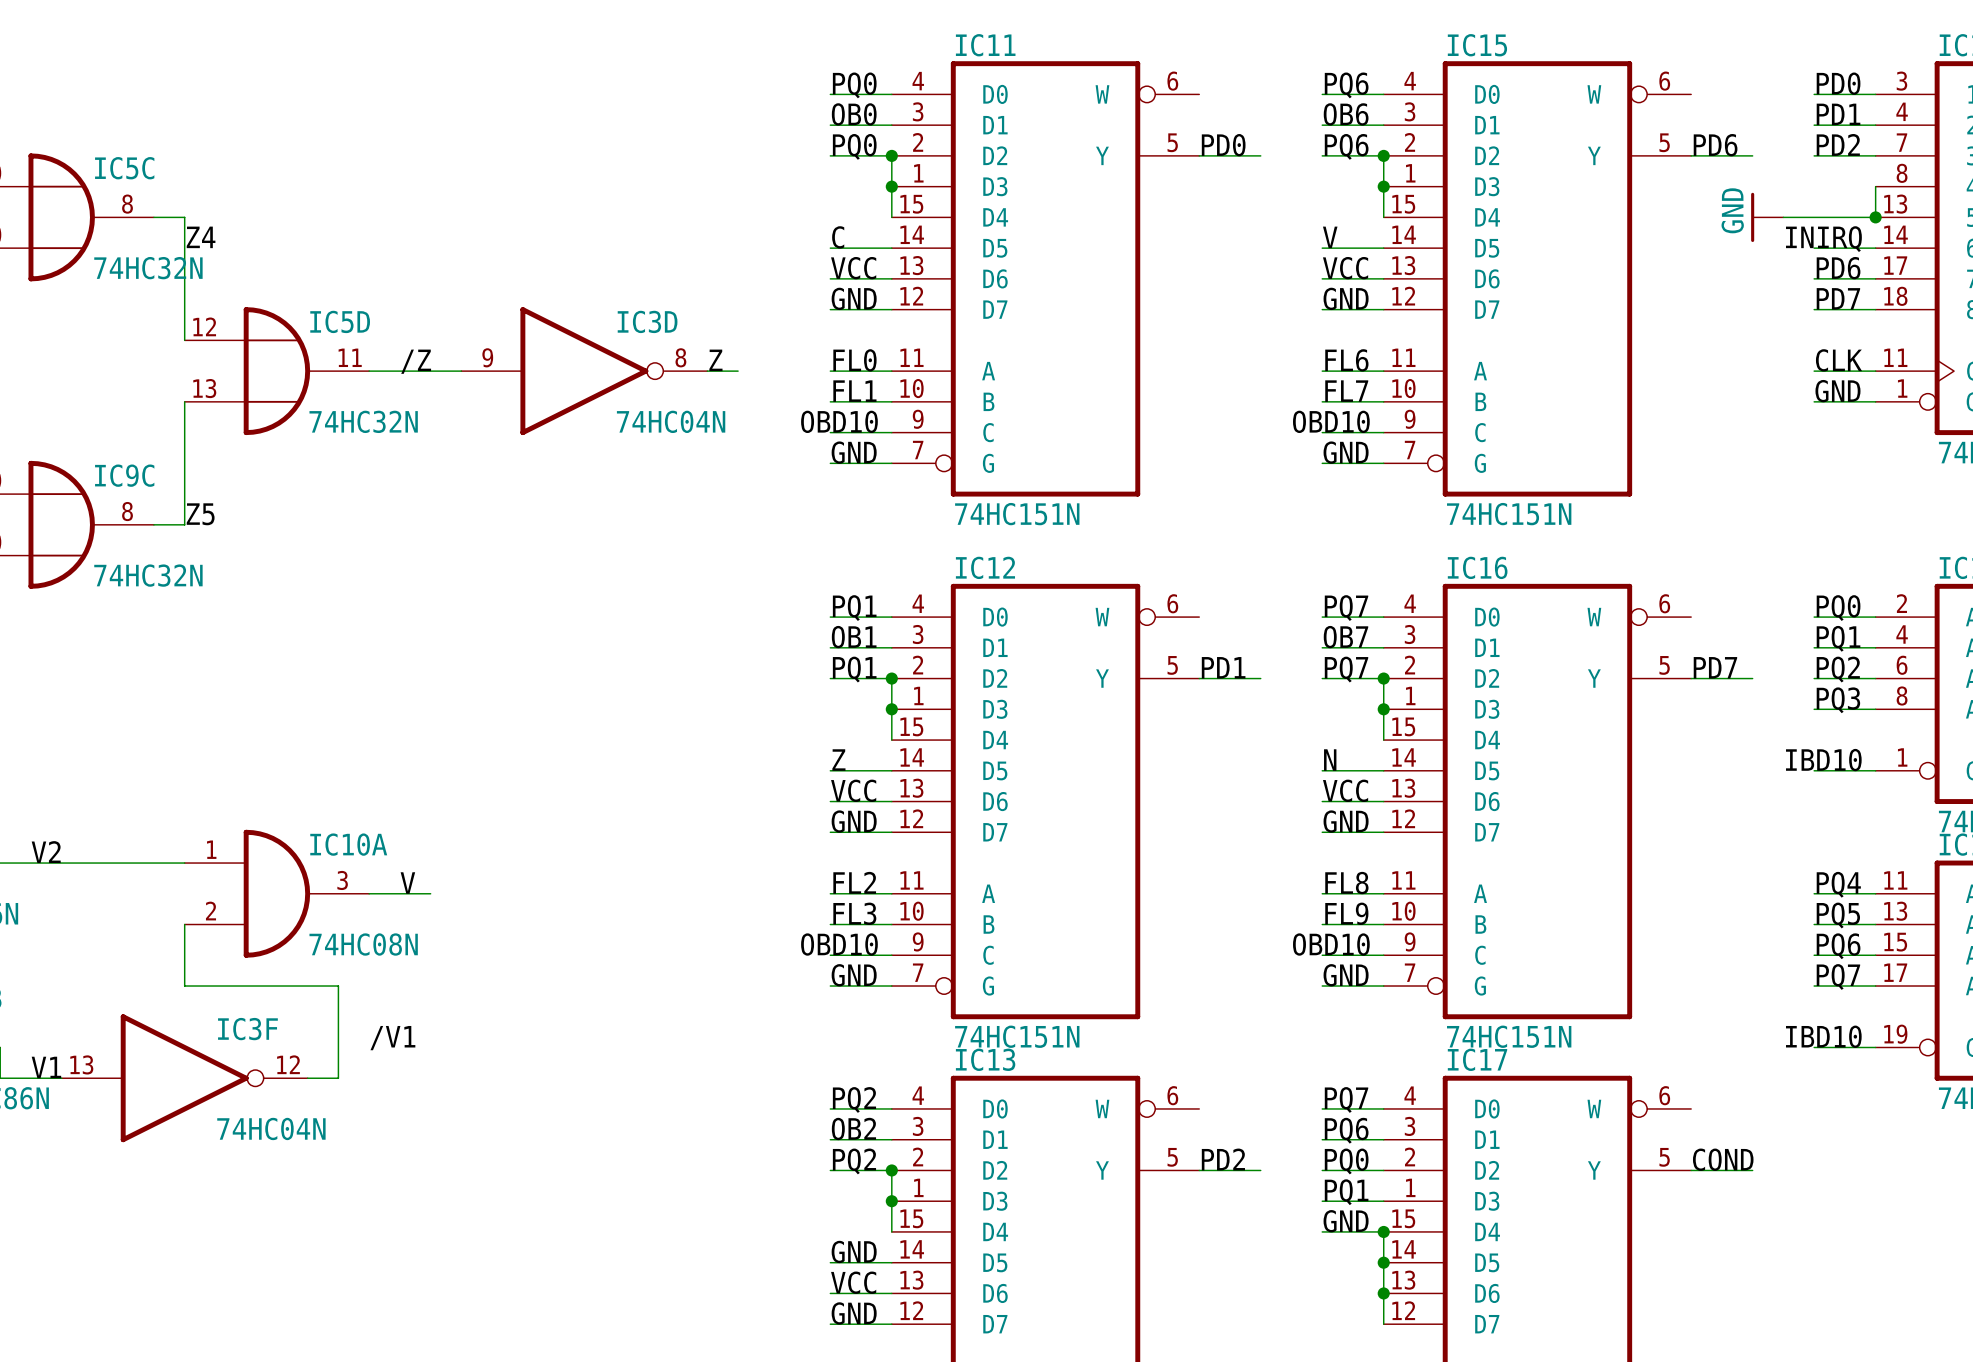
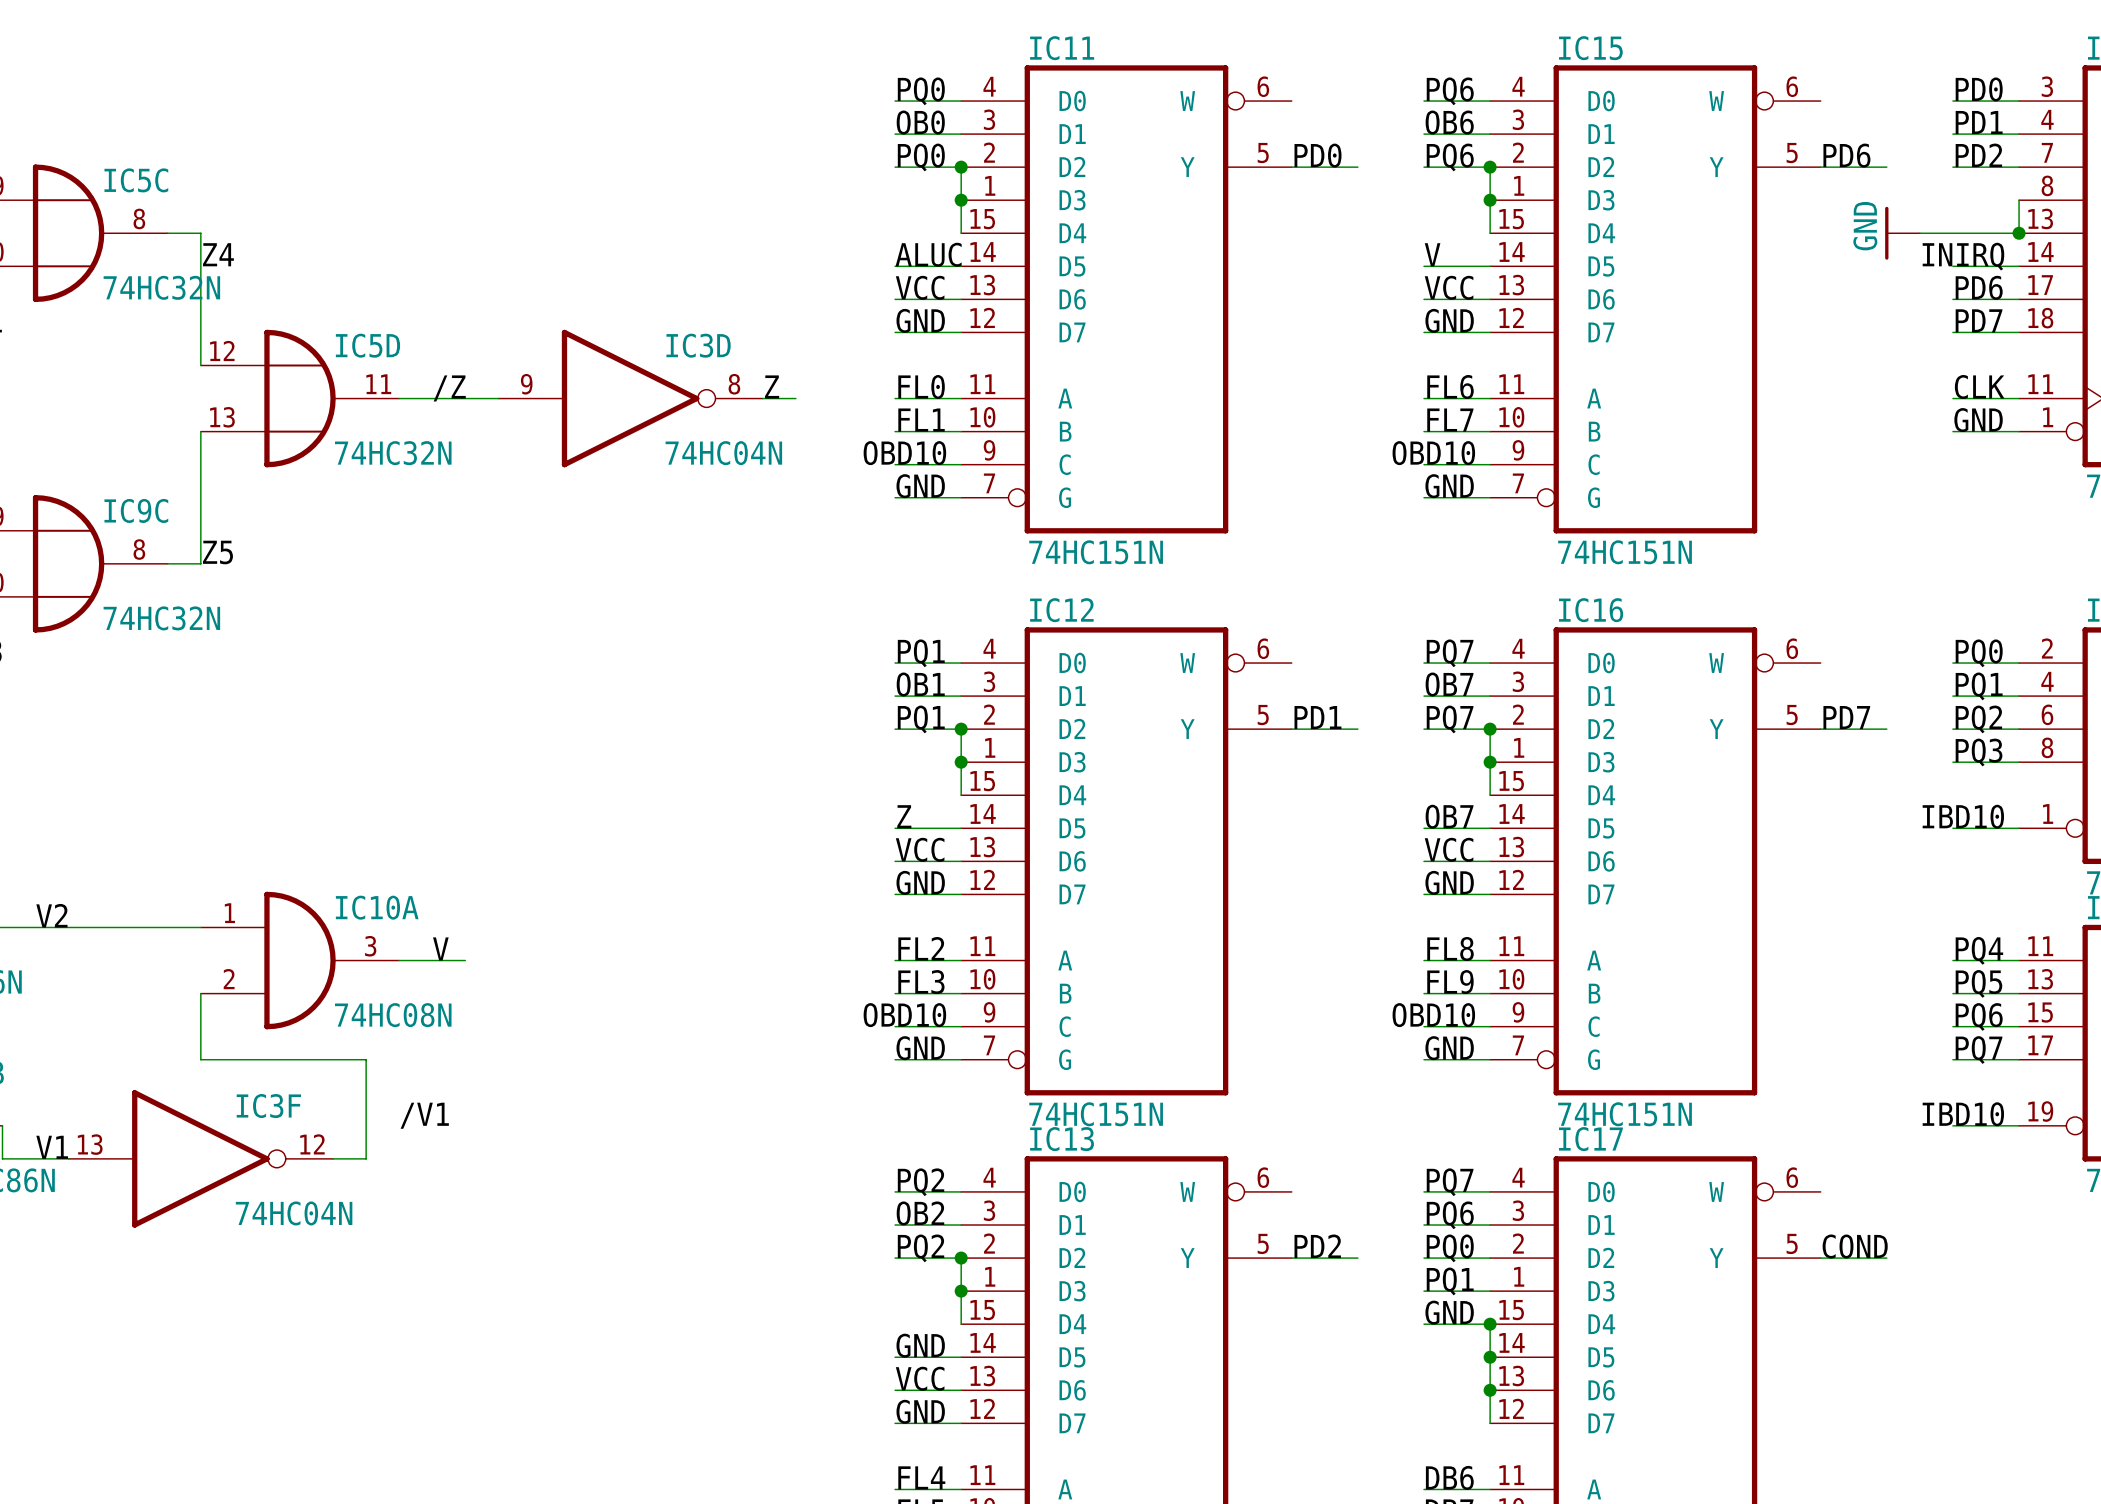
label: C (838, 237) -> ALUC (928, 254)
label: N (1330, 760) -> OB7 (1449, 816)

